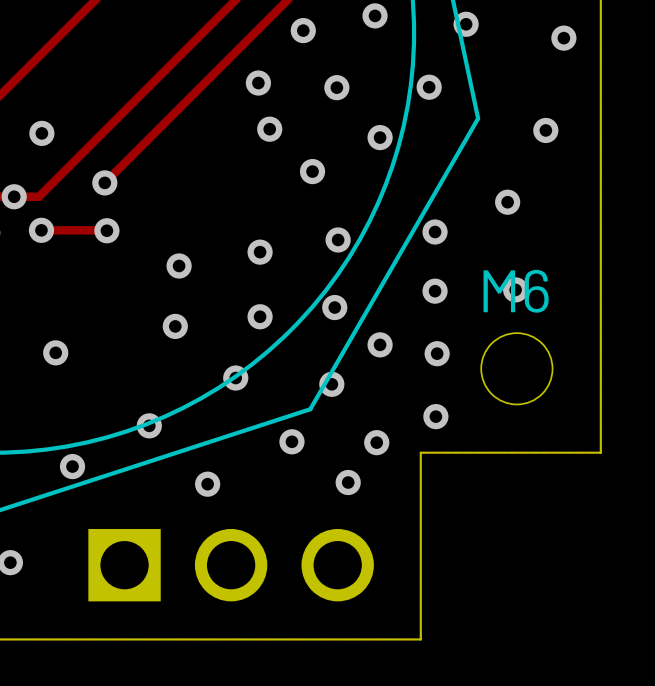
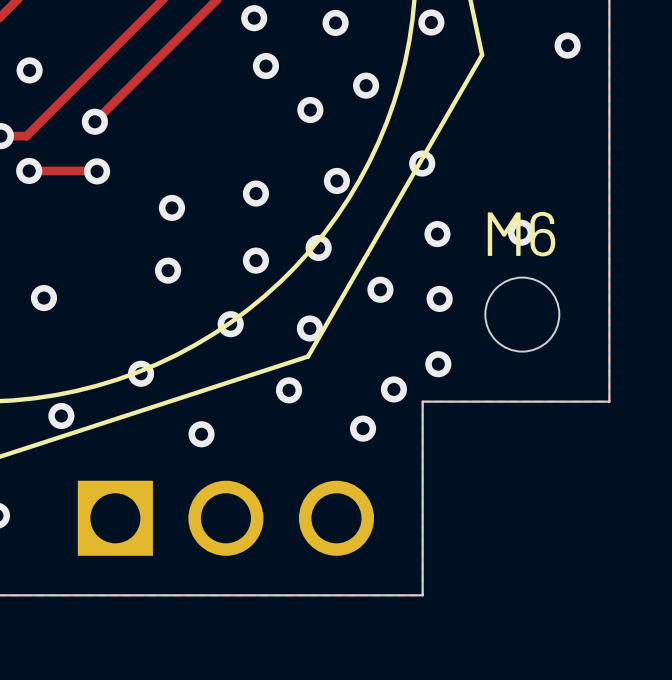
via position: (545, 130) -> (567, 45)
via position: (380, 137) -> (366, 85)
via: (507, 202) -> none
via position: (435, 232) -> (422, 163)
via position: (334, 307) -> (318, 247)
via position: (331, 384) -> (309, 328)
via position: (376, 442) -> (393, 389)
via position: (348, 482) -> (363, 428)

